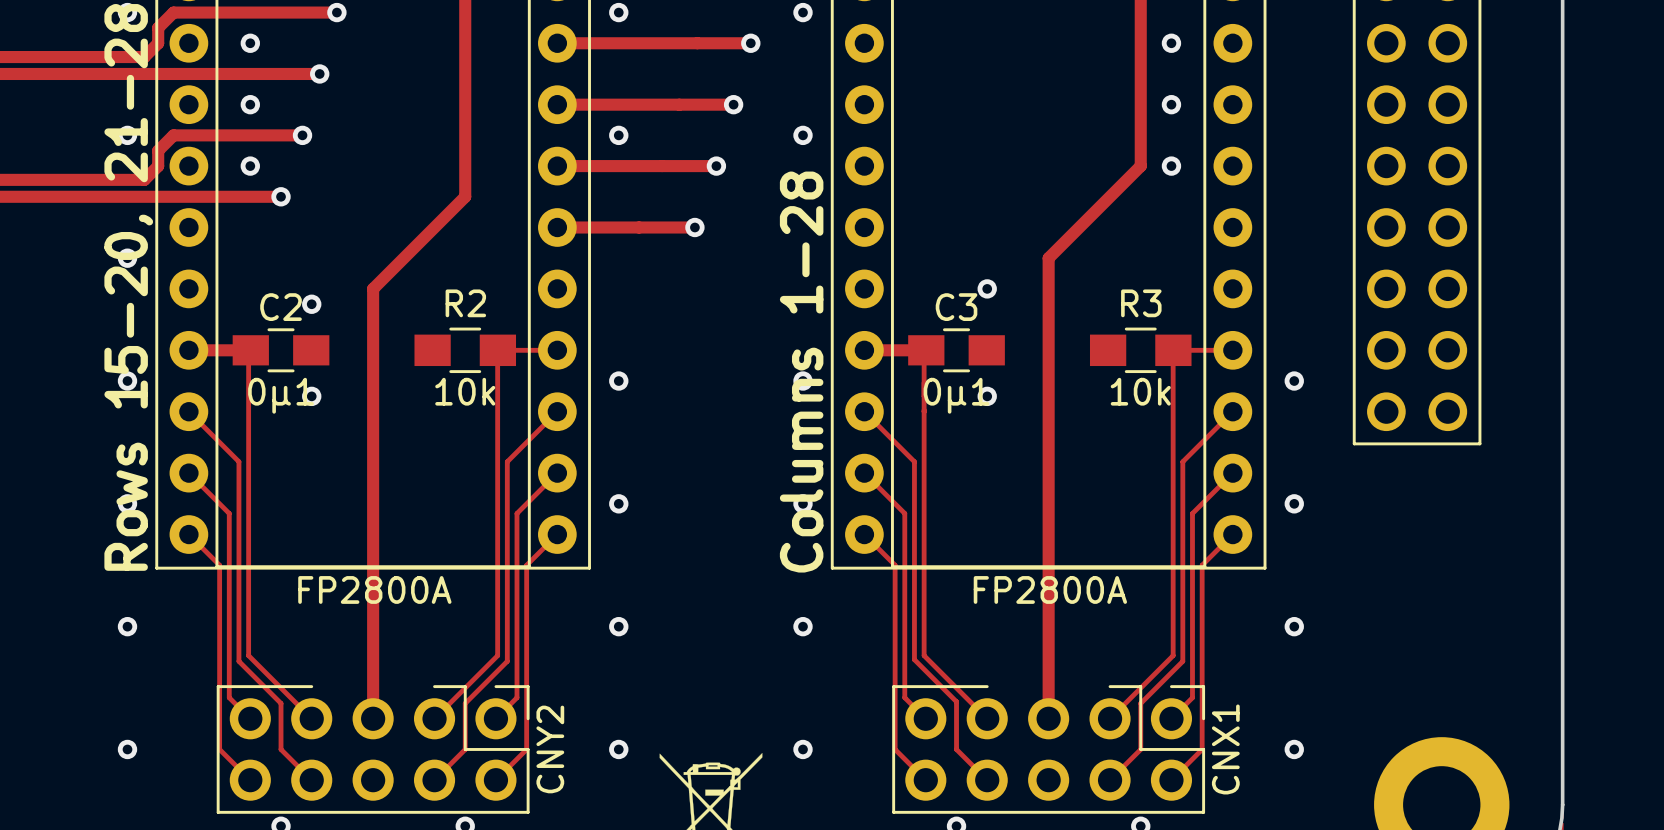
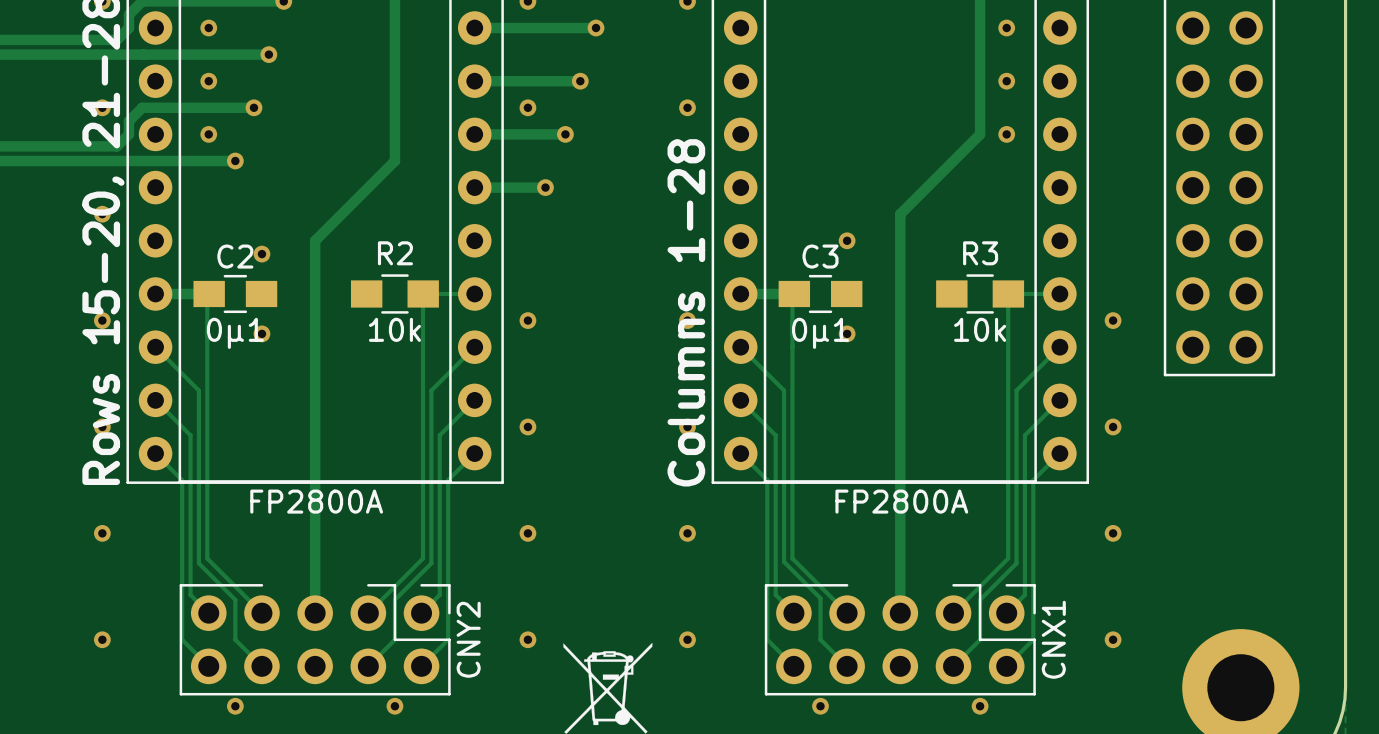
track: (697, 43) (750, 43) -> none
via: none -> (596, 28)
via: (750, 43) -> none
track: (679, 104) (733, 104) -> none
via: none -> (580, 81)
via: (733, 104) -> none
track: (662, 166) (716, 166) -> none
via: none -> (565, 134)
via: (716, 166) -> none
track: (639, 227) (694, 227) -> none
via: none -> (545, 187)
via: (694, 227) -> none

